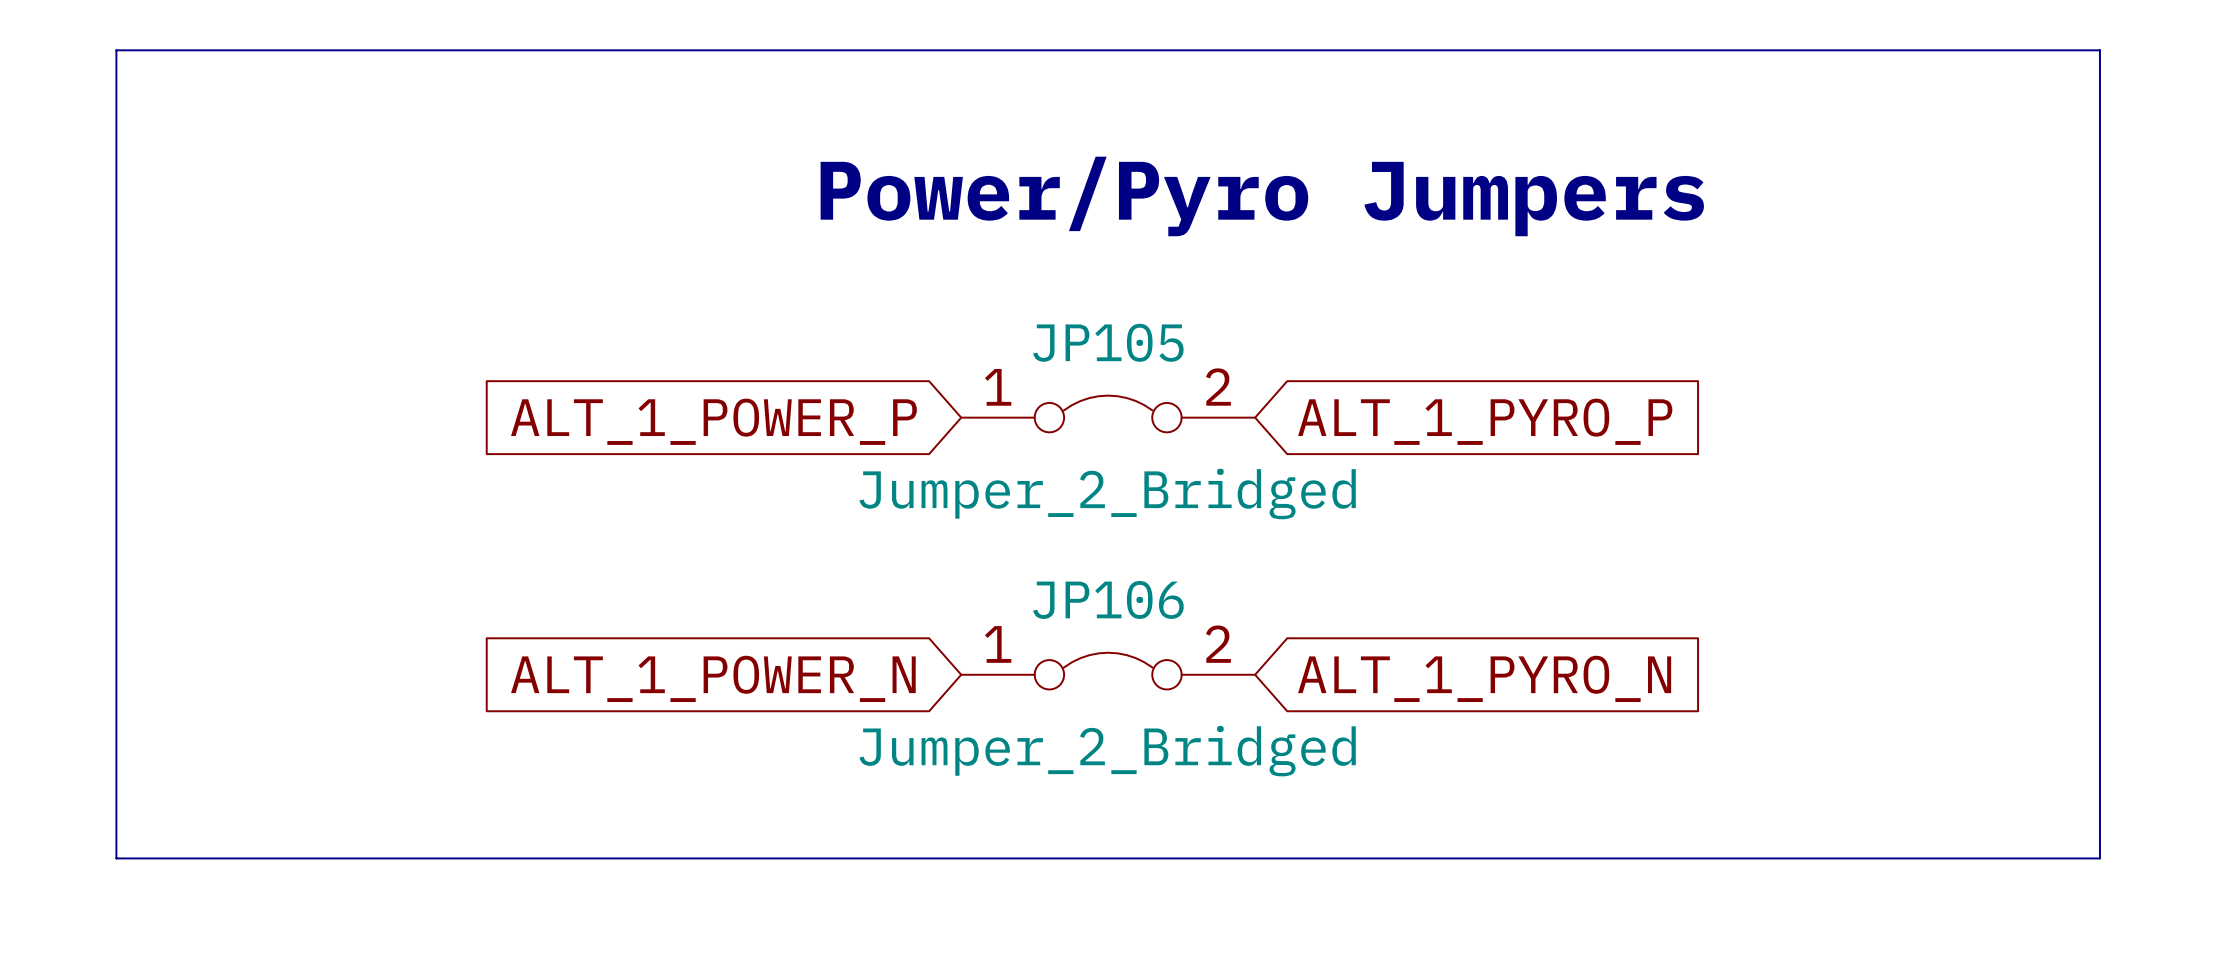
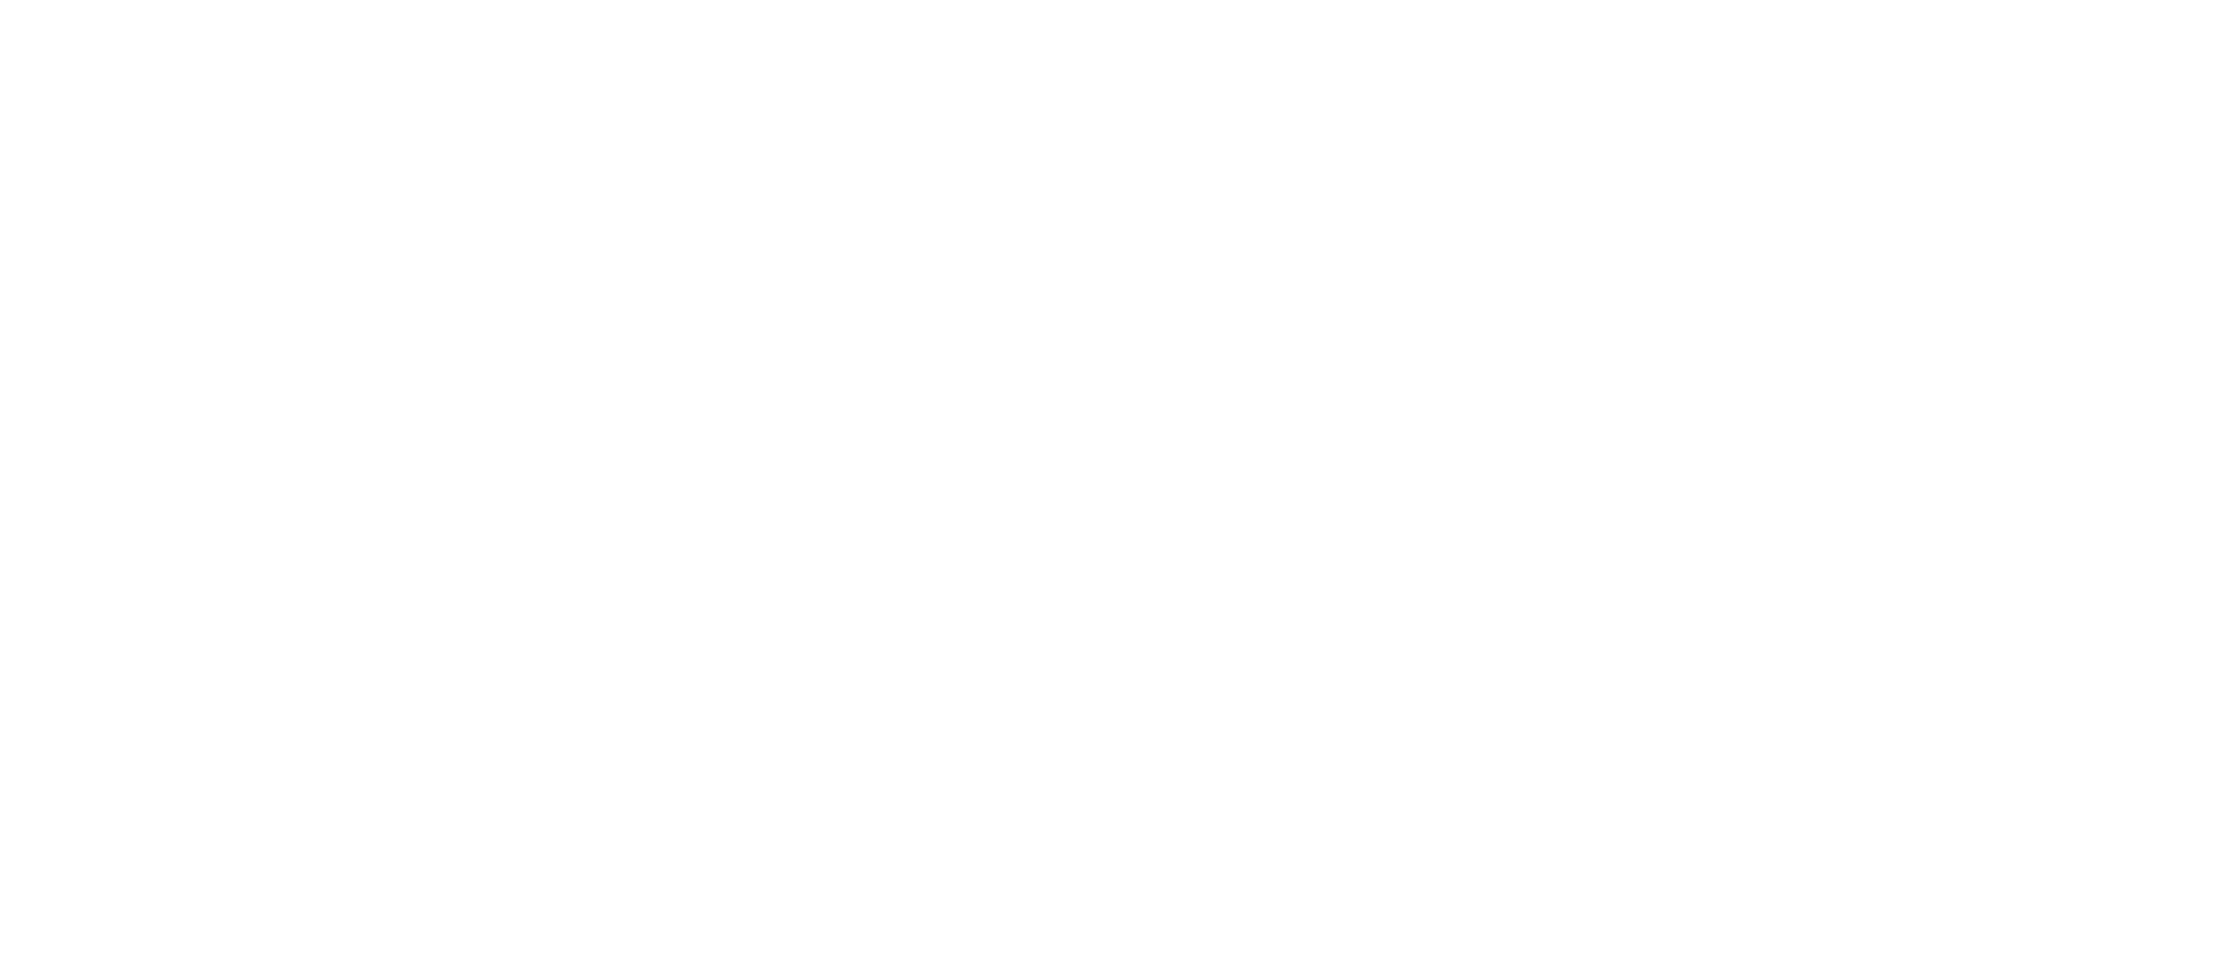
line: (116, 50) (2099, 50) (2099, 858) (116, 858) (116, 50) -> none
text: Power/Pyro Jumpers (1262, 196) -> none
JP105: Jumper_2_Bridged (1108, 413) -> none
global label: ALT_1_POWER_P (713, 421) -> none
global label: ALT_1_PYRO_P (1485, 421) -> none
JP106: Jumper_2_Bridged (1108, 671) -> none
global label: ALT_1_POWER_N (713, 678) -> none
global label: ALT_1_PYRO_N (1484, 678) -> none

